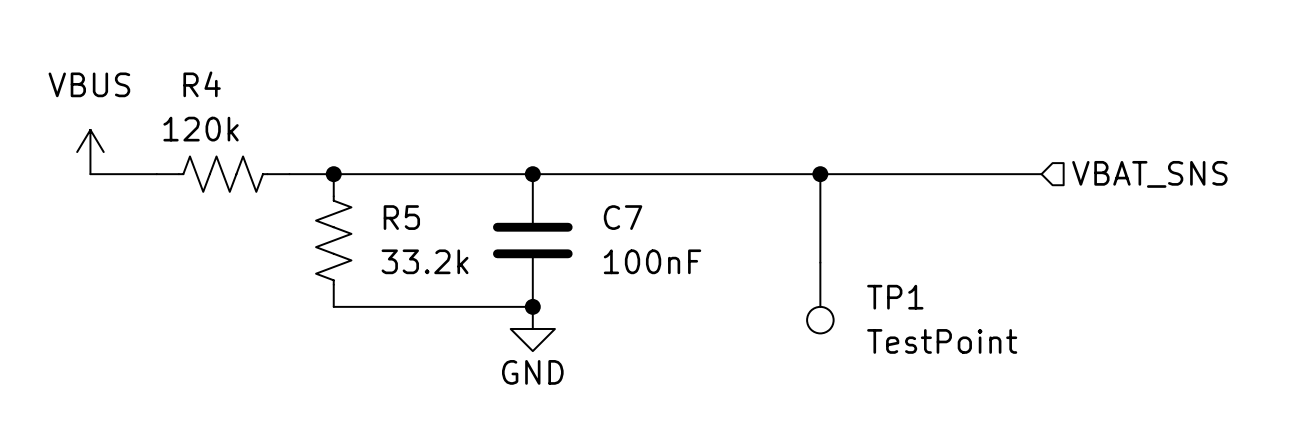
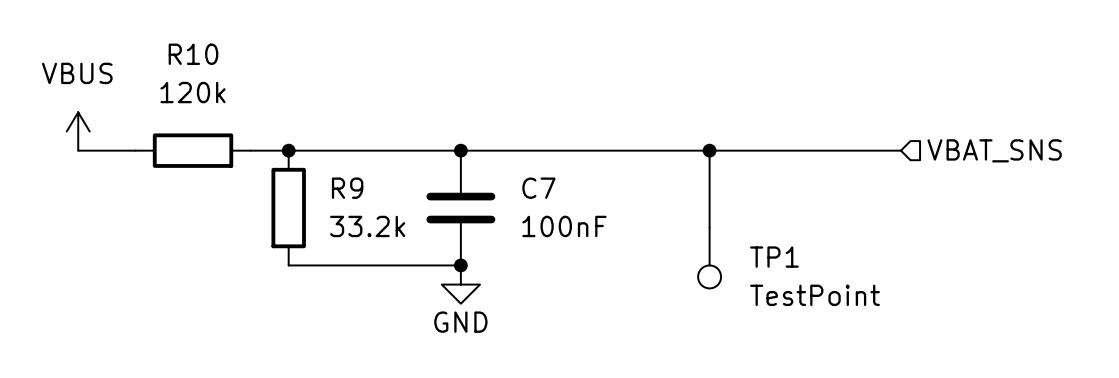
R4: 120k (223, 174) -> none
R10: none -> 120k (193, 150)
R5: 33.2k (333, 240) -> none
R9: none -> 33.2k (288, 208)

